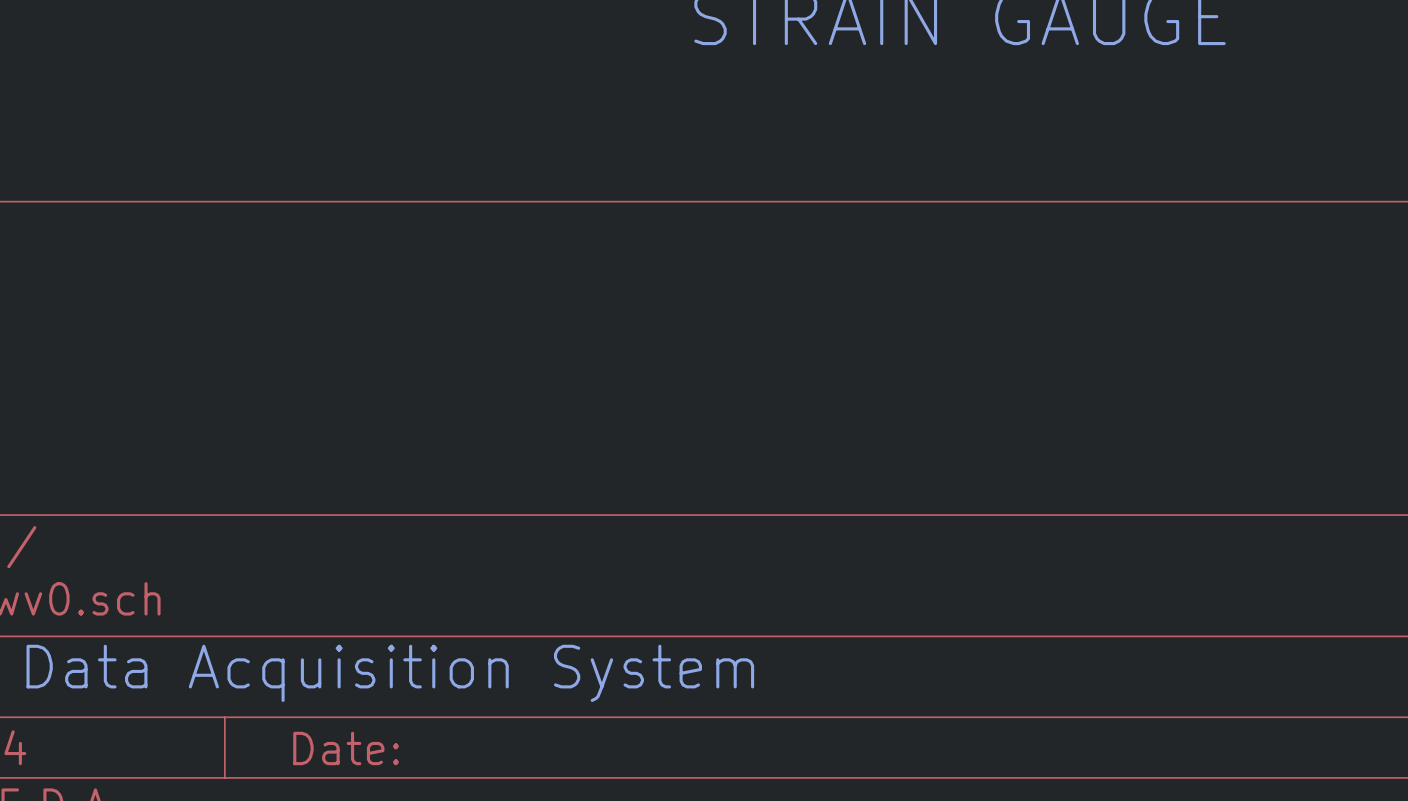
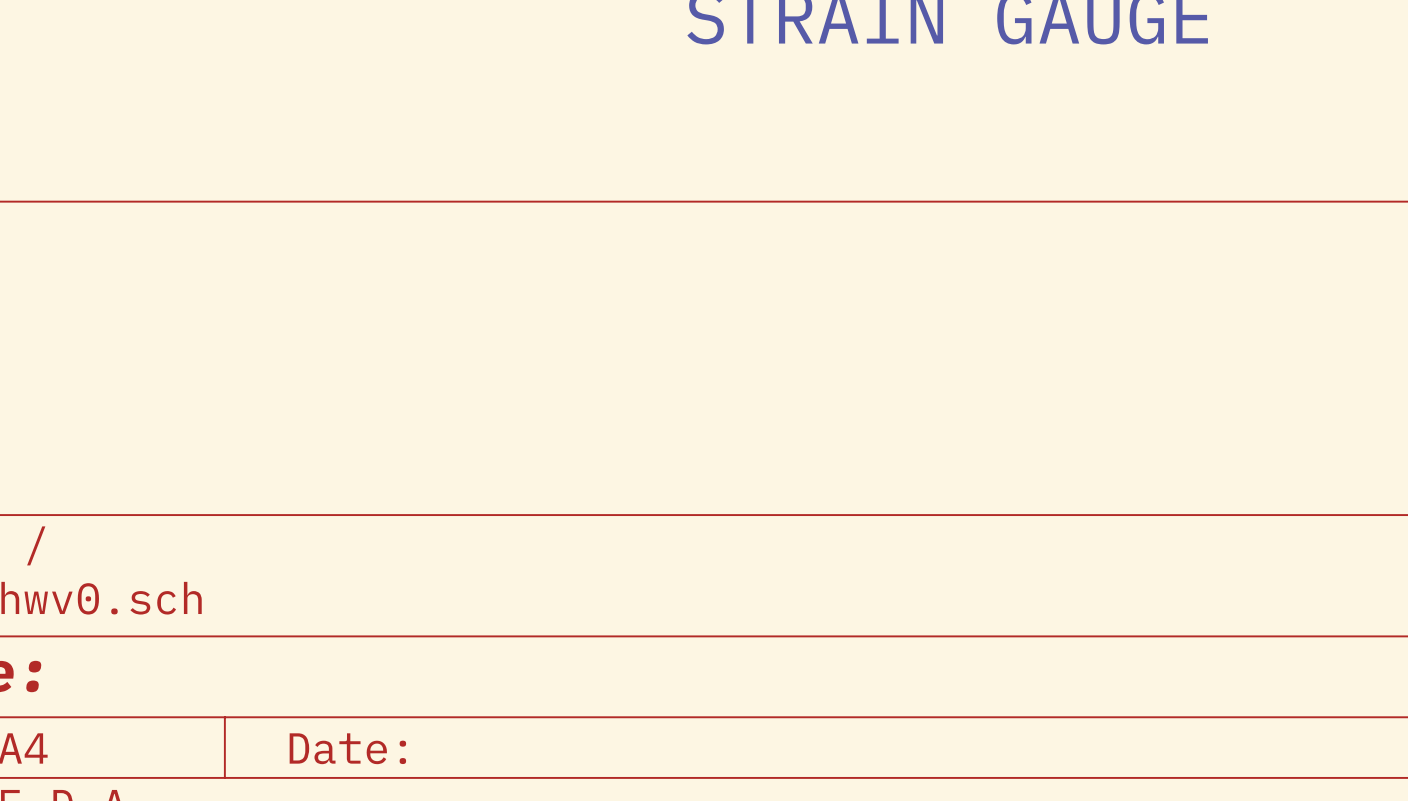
text: Data Acquisition System (390, 673) -> none

